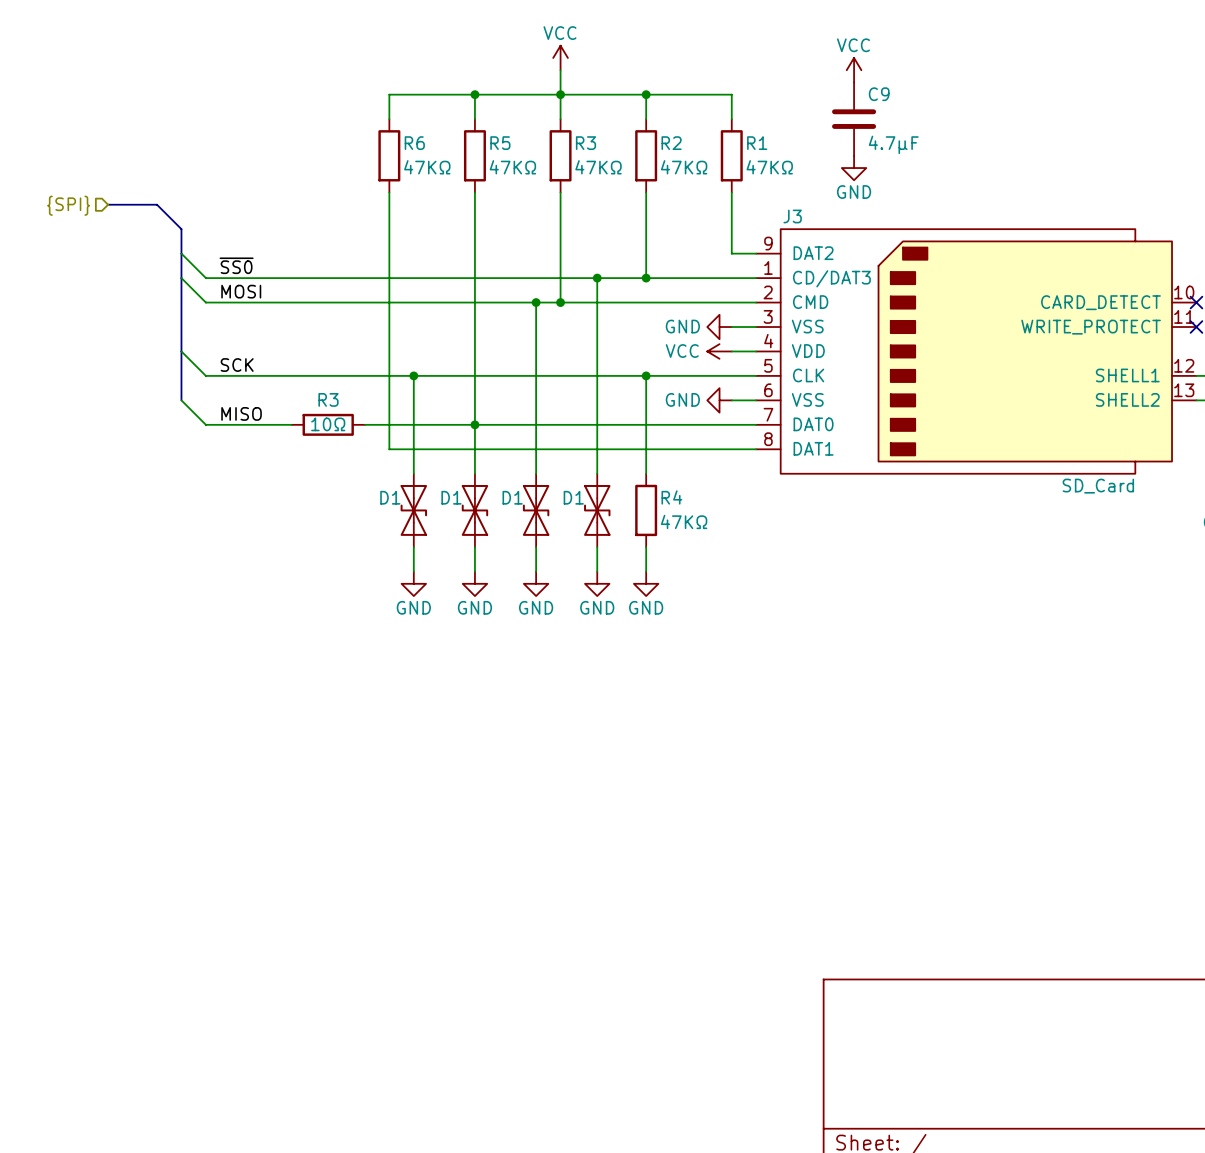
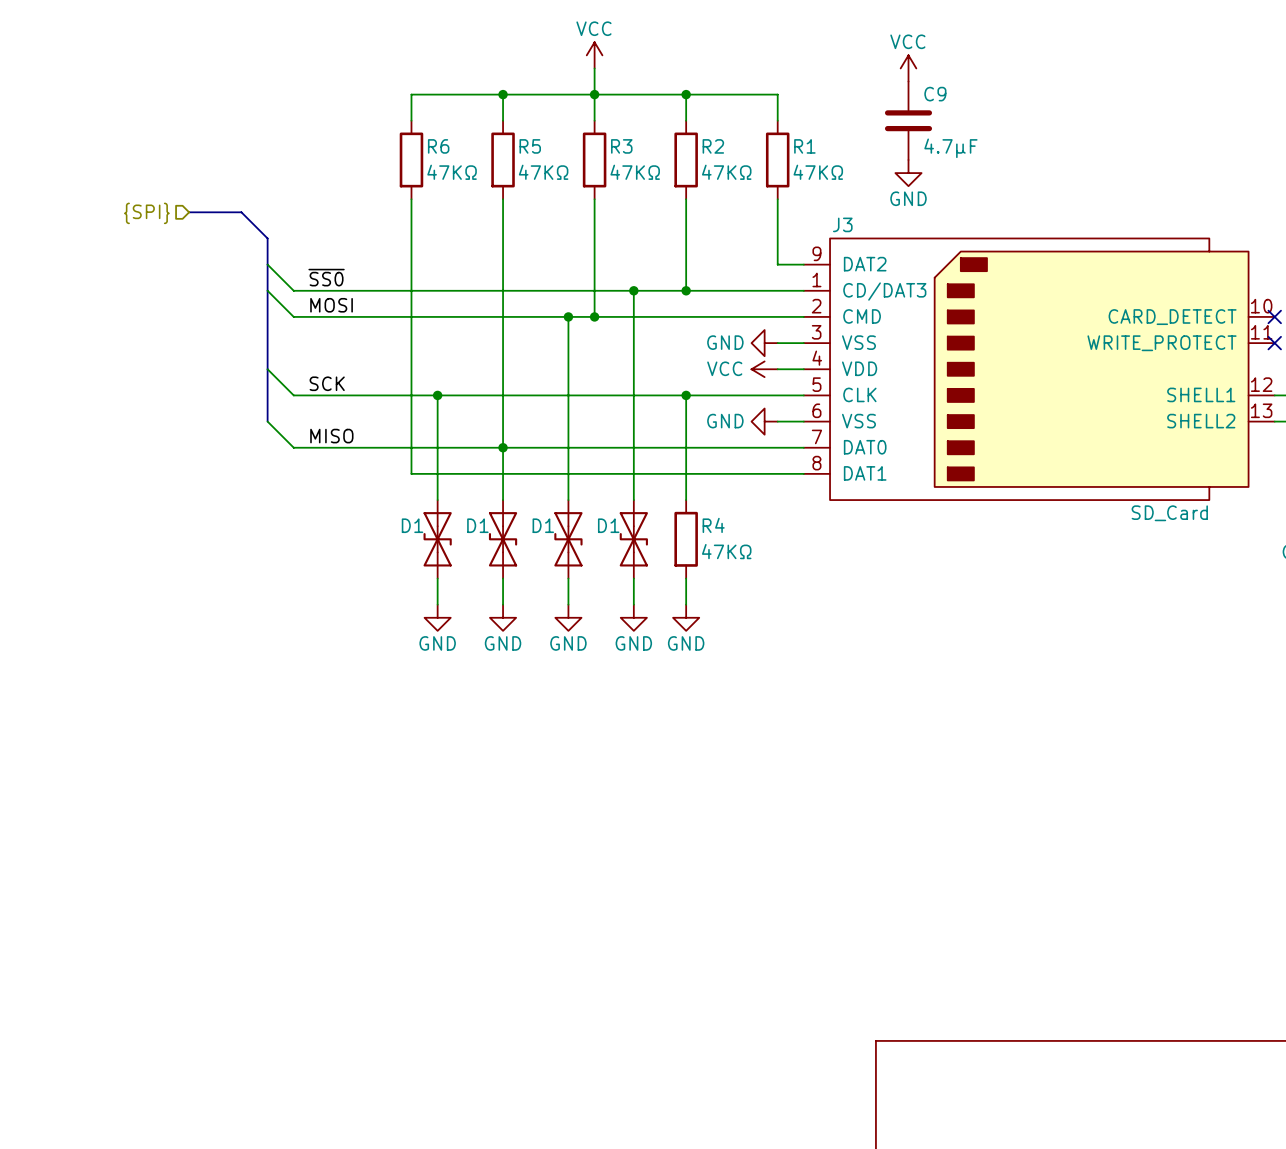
bus: (108, 204) (157, 204) (181, 229) (181, 400) -> (189, 212) (241, 212) (267, 238) (267, 421)
hierarchical label position: {SPI} (68, 205) -> {SPI} (146, 213)
wire: (181, 253) (205, 278) (279, 278) -> (267, 264) (293, 290)
label position: ~{SS0} (236, 265) -> ~{SS0} (326, 277)
wire: (181, 278) (205, 302) (279, 302) -> (267, 290) (293, 316)
label position: MOSI (241, 291) -> MOSI (331, 305)
wire: (181, 351) (205, 375) (279, 375) -> (267, 369) (293, 395)
label position: SCK (237, 365) -> SCK (327, 383)
wire: (181, 400) (205, 424) (279, 424) -> (267, 421) (293, 447)
label position: MISO (241, 413) -> MISO (331, 436)
wire: none -> (306, 447) (385, 447)
R3: 10Ω (328, 424) -> none

